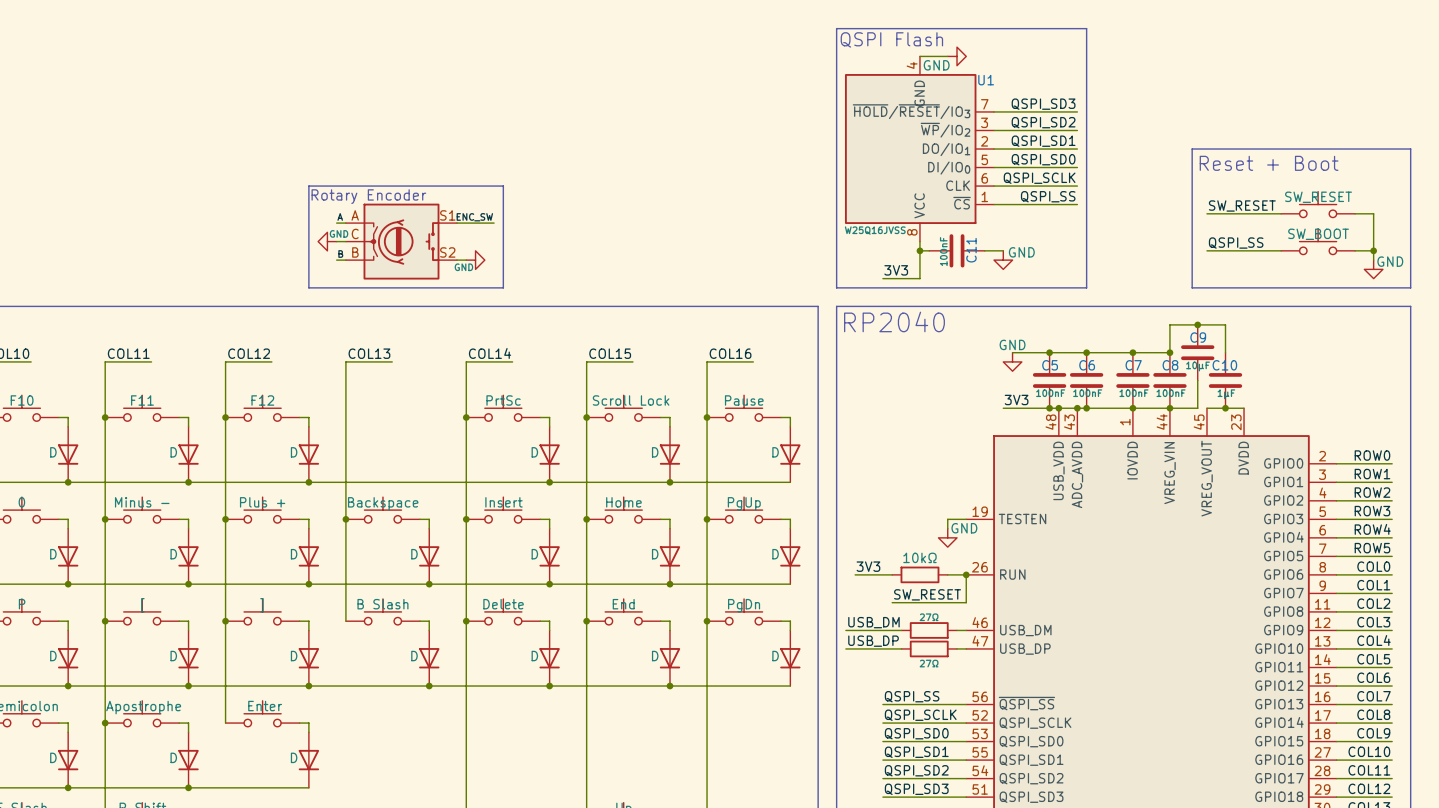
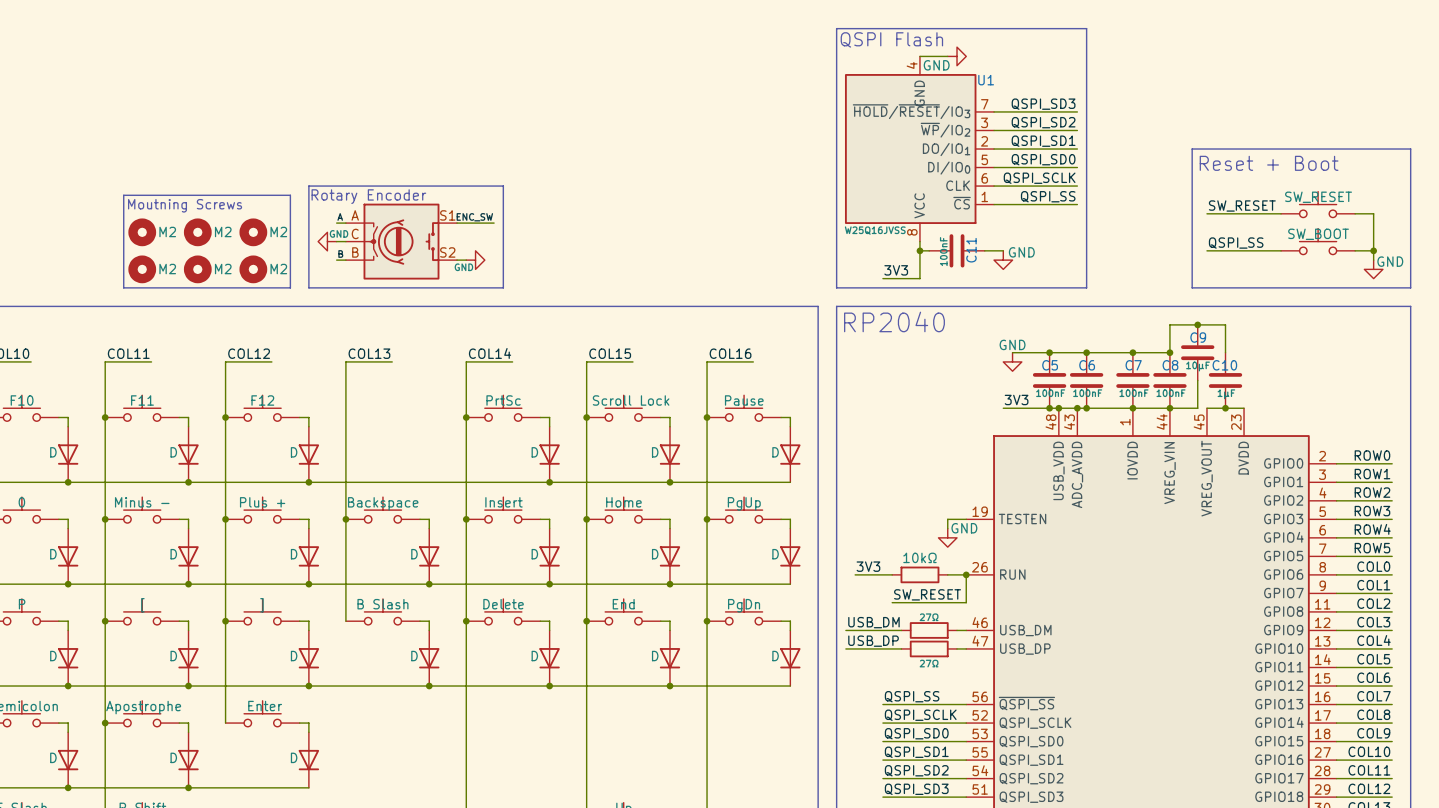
line: none -> (123, 195) (290, 195) (290, 287) (123, 287) (123, 195)
text: none -> Moutning Screws (185, 205)
part: none -> M2 (142, 232)
part: none -> M2 (197, 232)
part: none -> M2 (253, 232)
part: none -> M2 (142, 269)
part: none -> M2 (197, 269)
part: none -> M2 (253, 269)

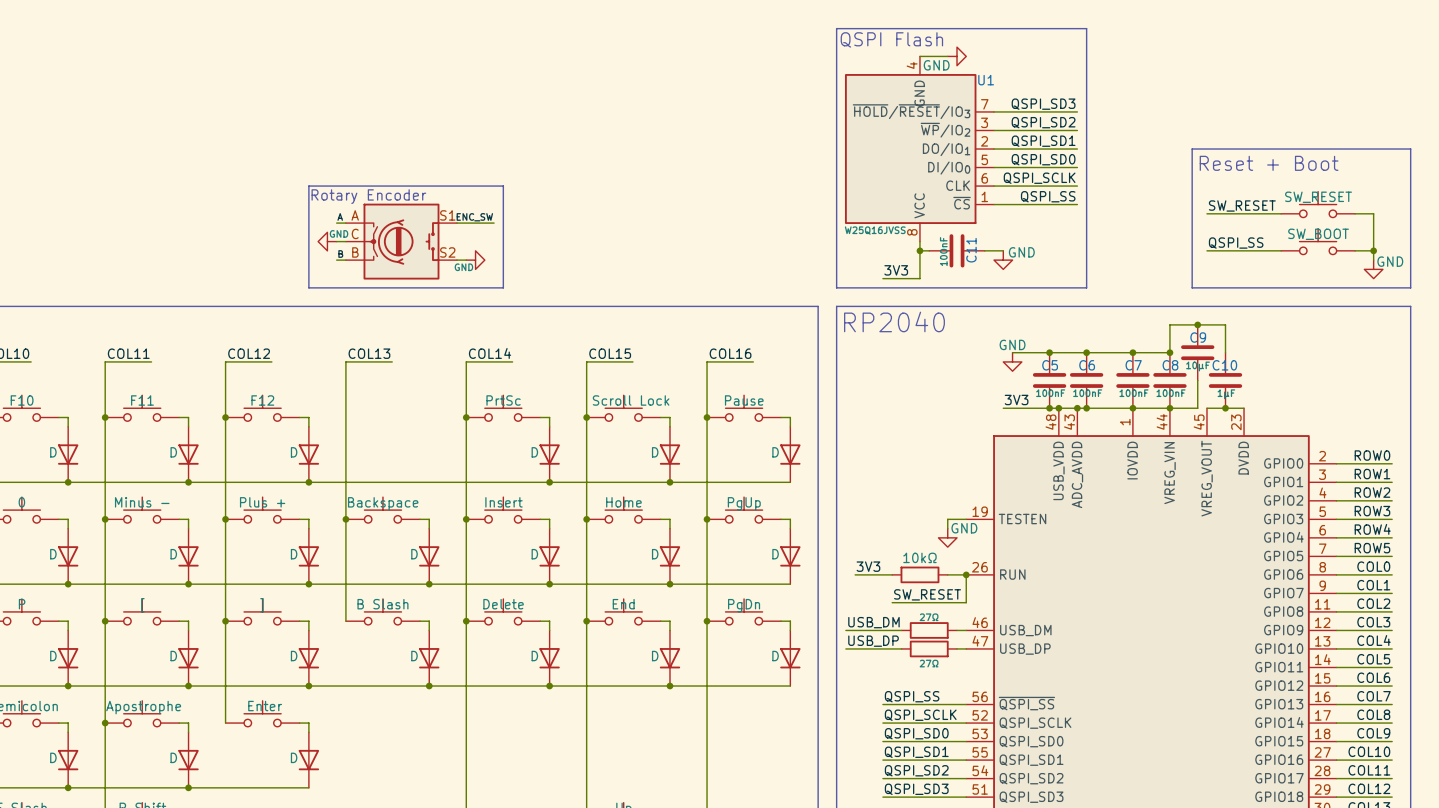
line: (123, 195) (290, 195) (290, 287) (123, 287) (123, 195) -> none
text: Moutning Screws (185, 205) -> none
part: M2 (142, 232) -> none
part: M2 (197, 232) -> none
part: M2 (253, 232) -> none
part: M2 (142, 269) -> none
part: M2 (197, 269) -> none
part: M2 (253, 269) -> none

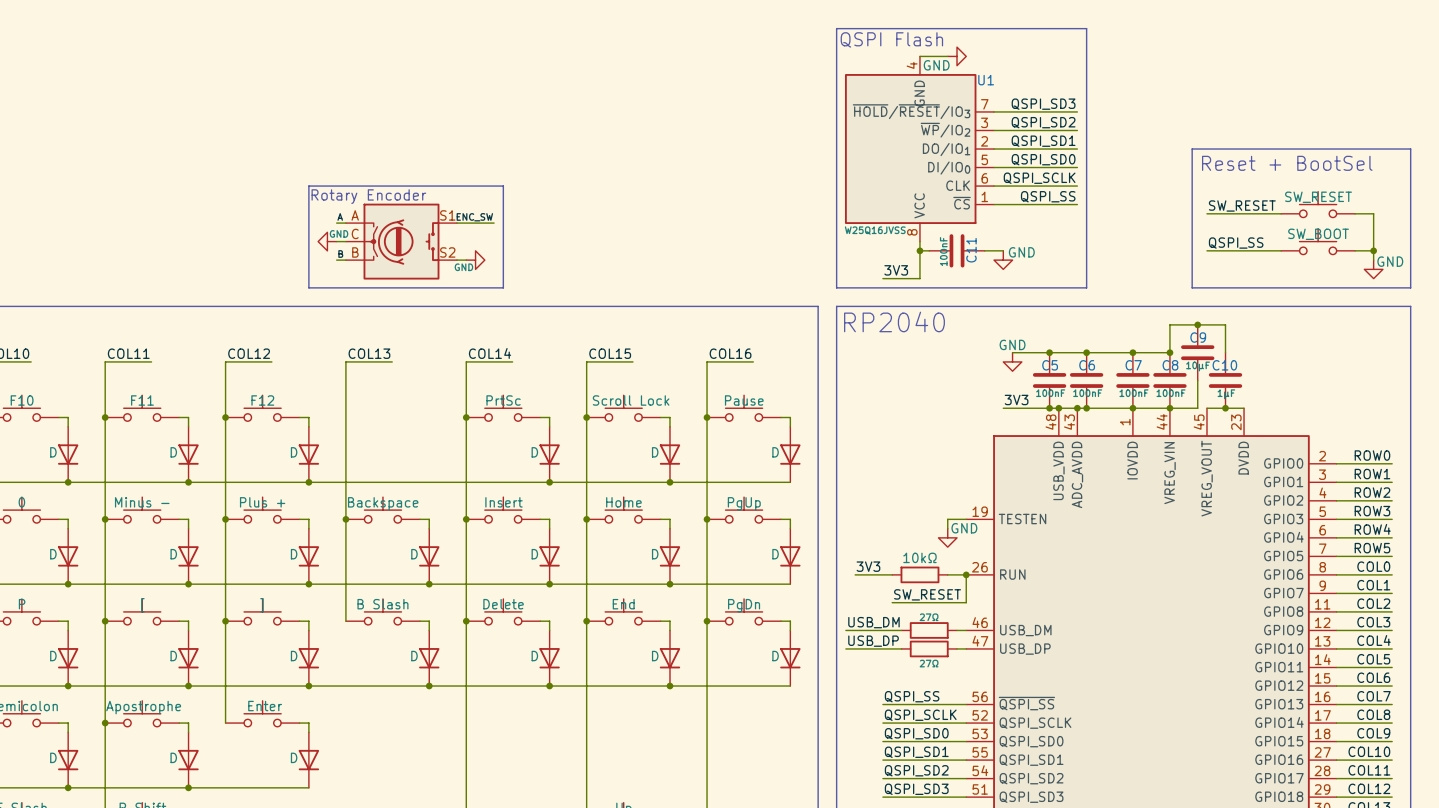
text: Reset + Boot (1269, 163) -> Reset + BootSel (1287, 163)

